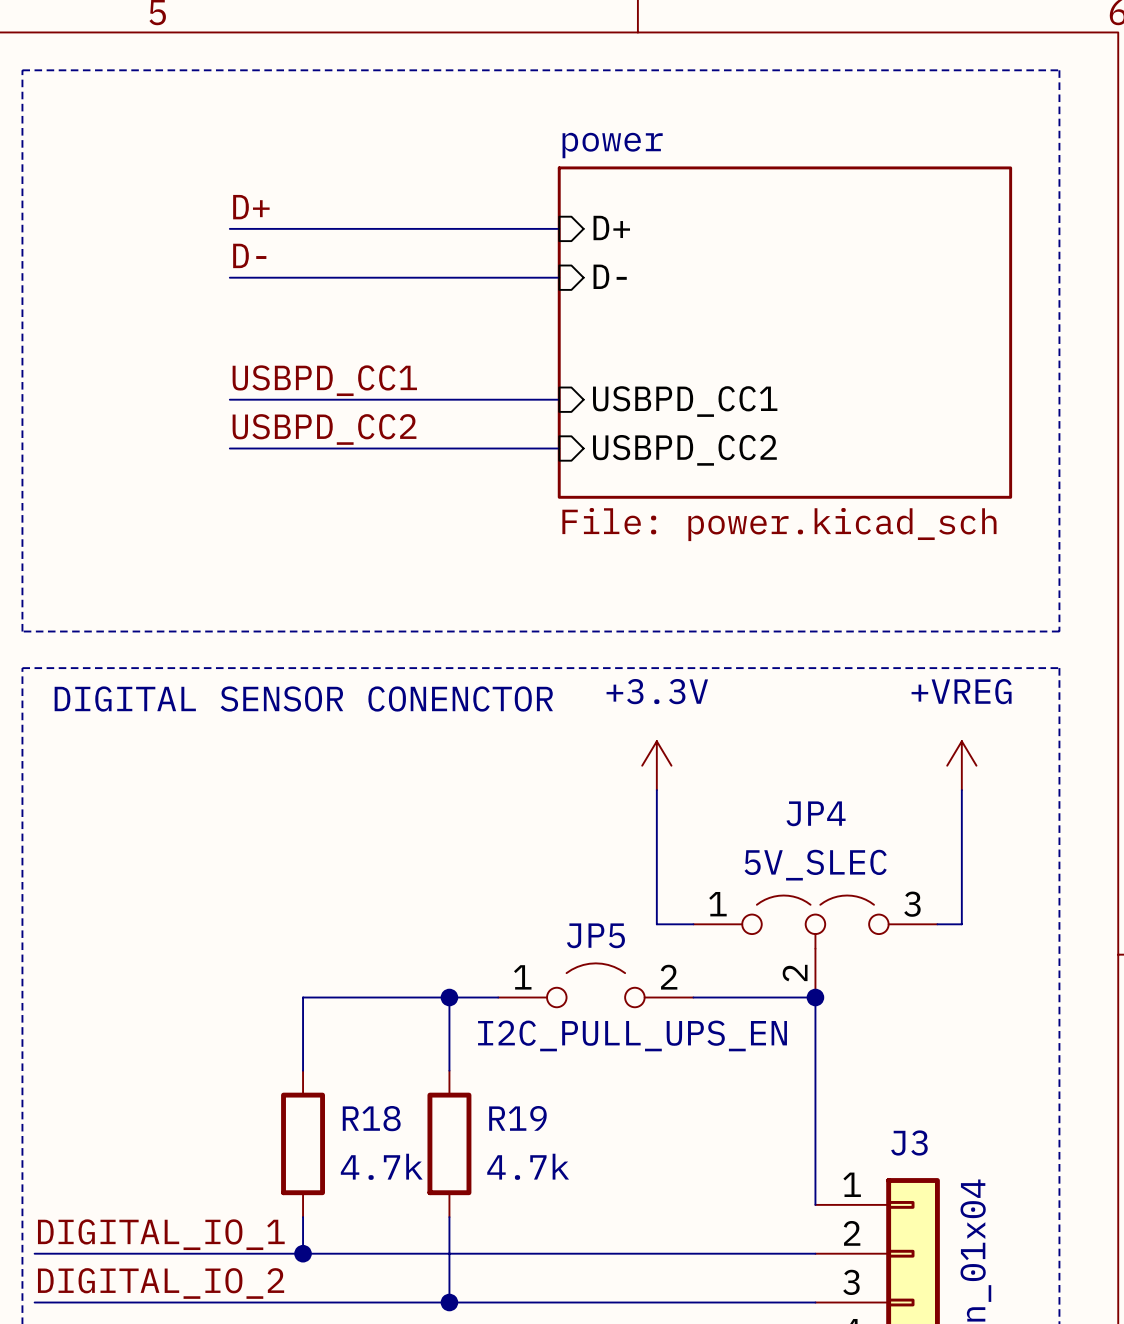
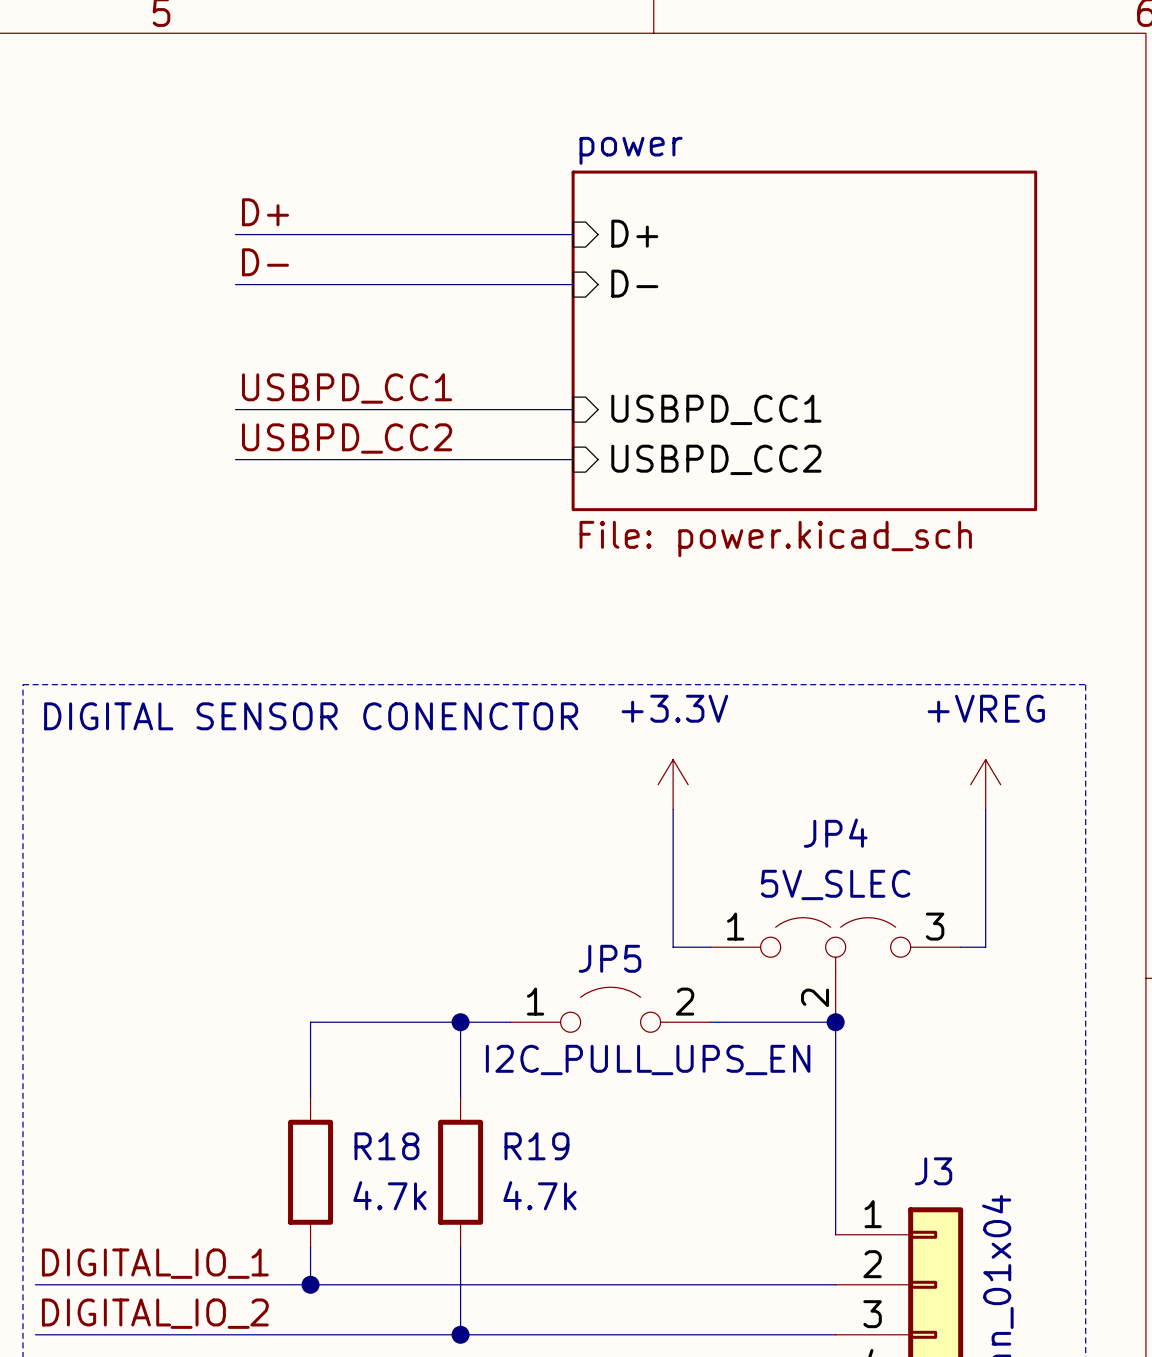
line: (22, 70) (22, 631) (1059, 631) (1059, 70) (22, 70) -> none

